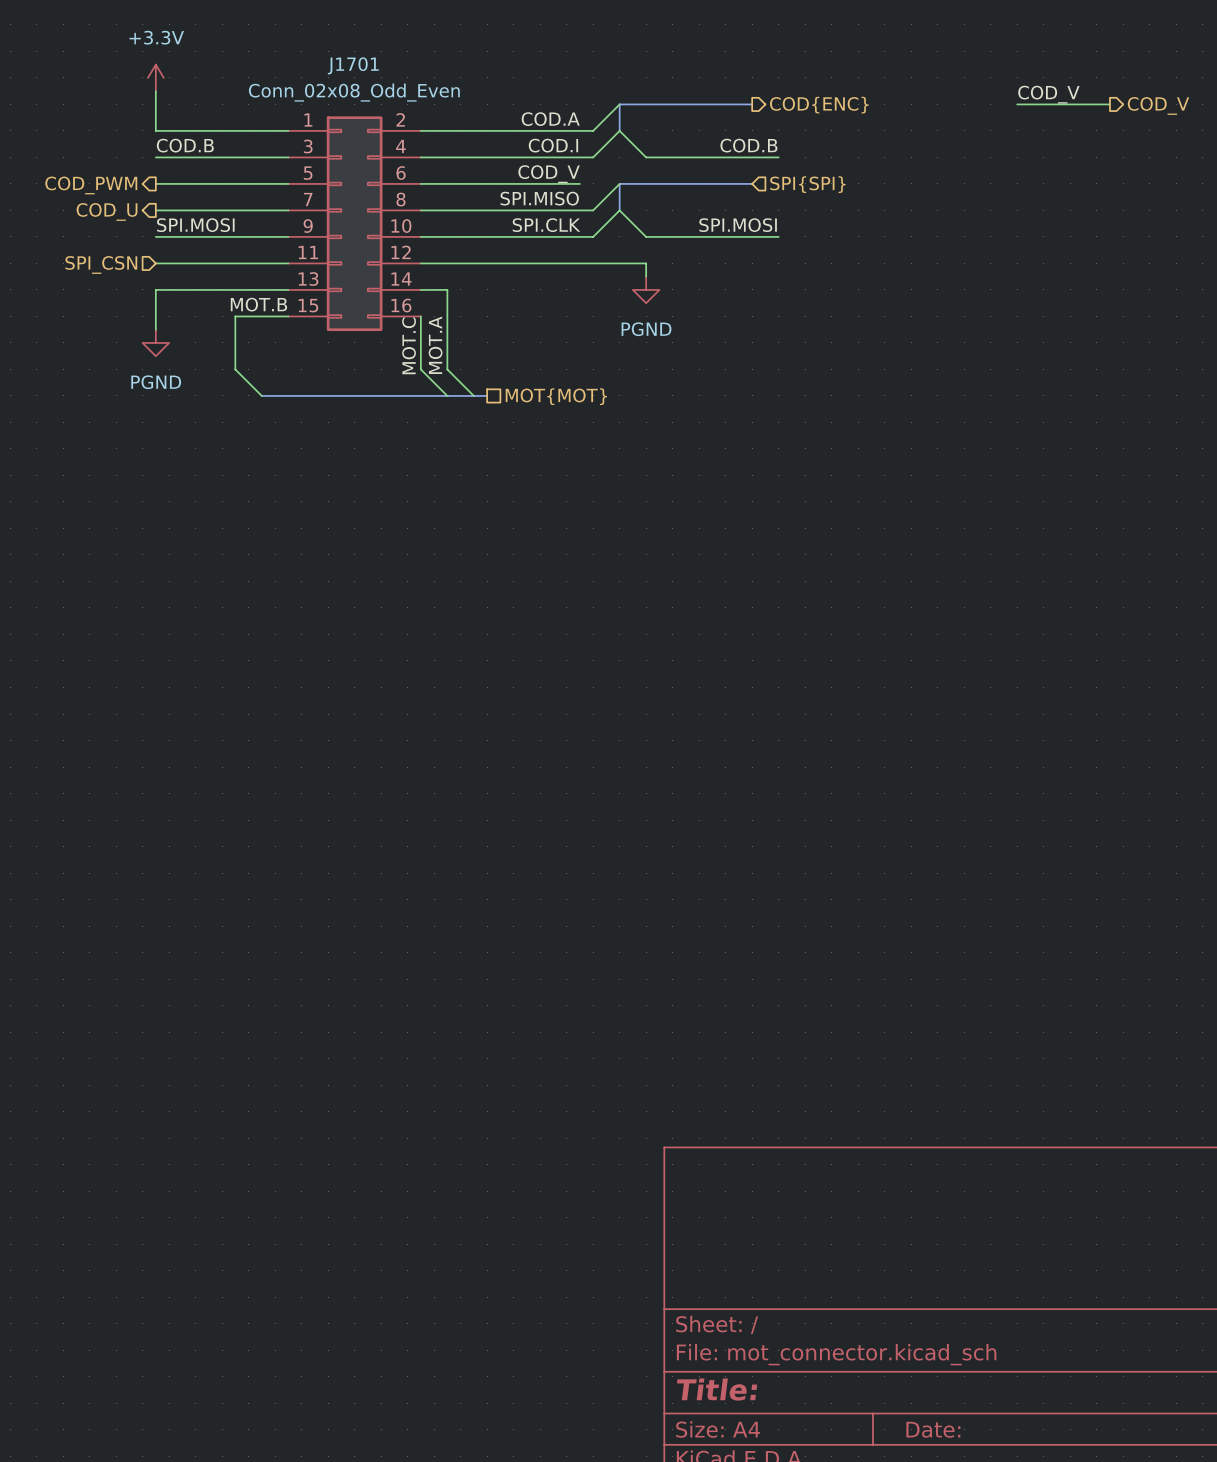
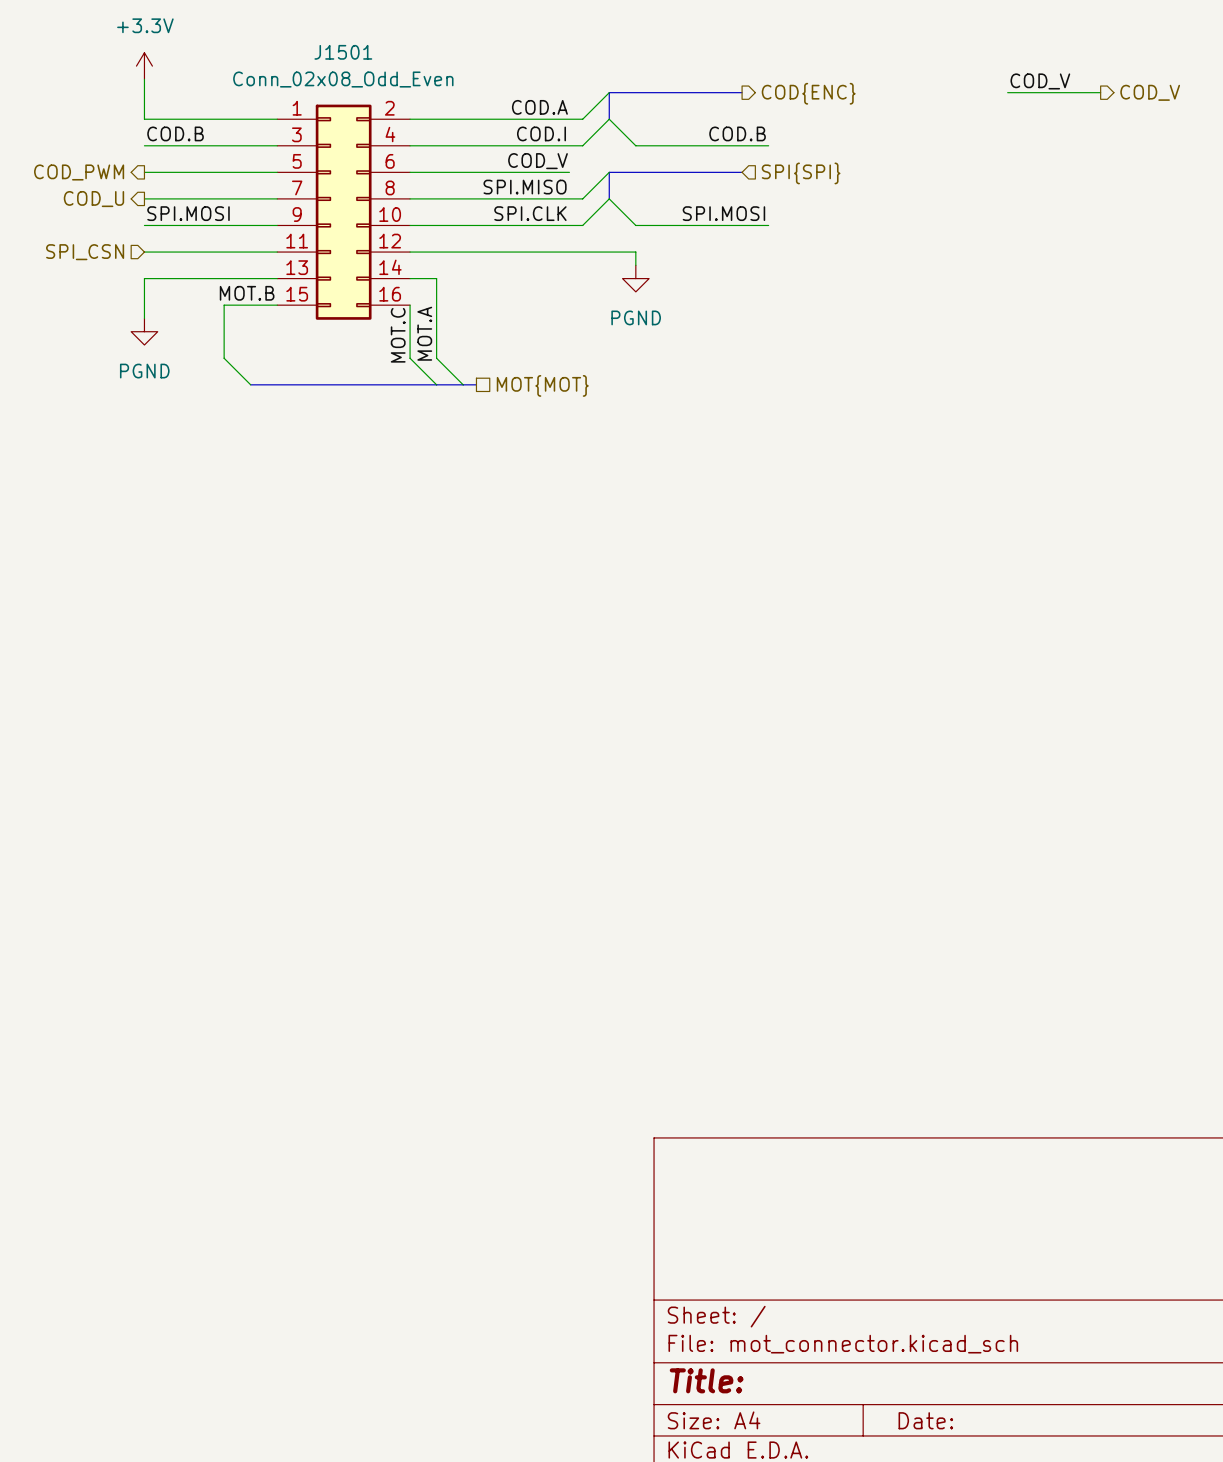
J1701 name: J1701 (353, 65) -> J1501 (343, 52)

